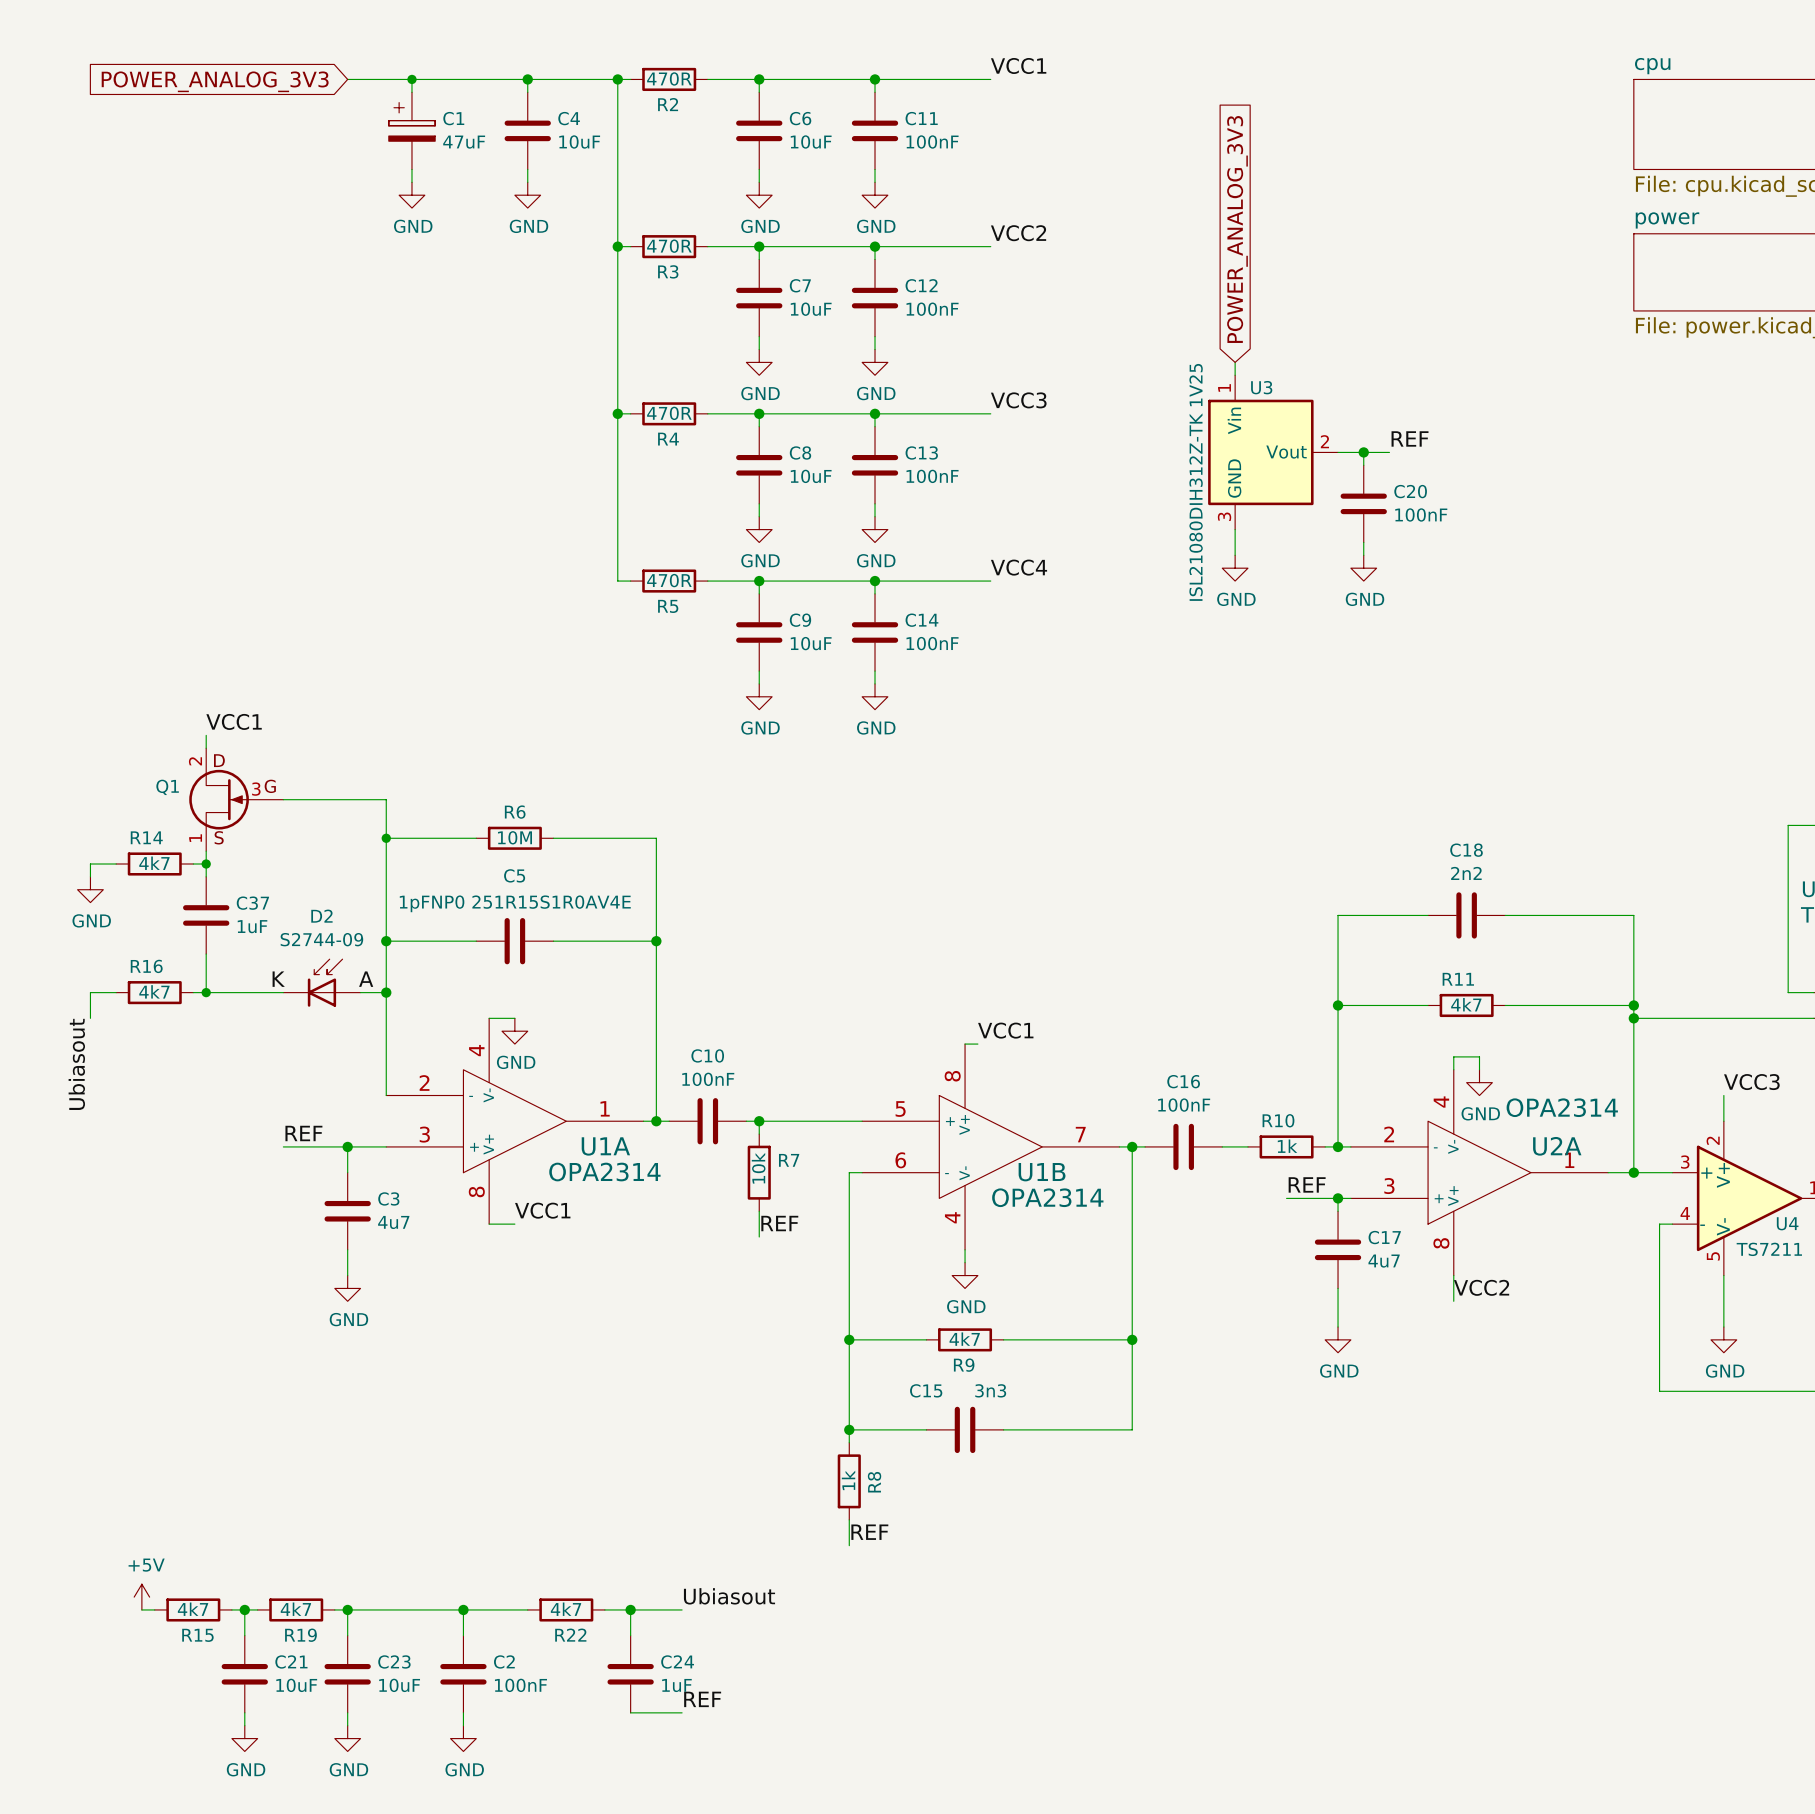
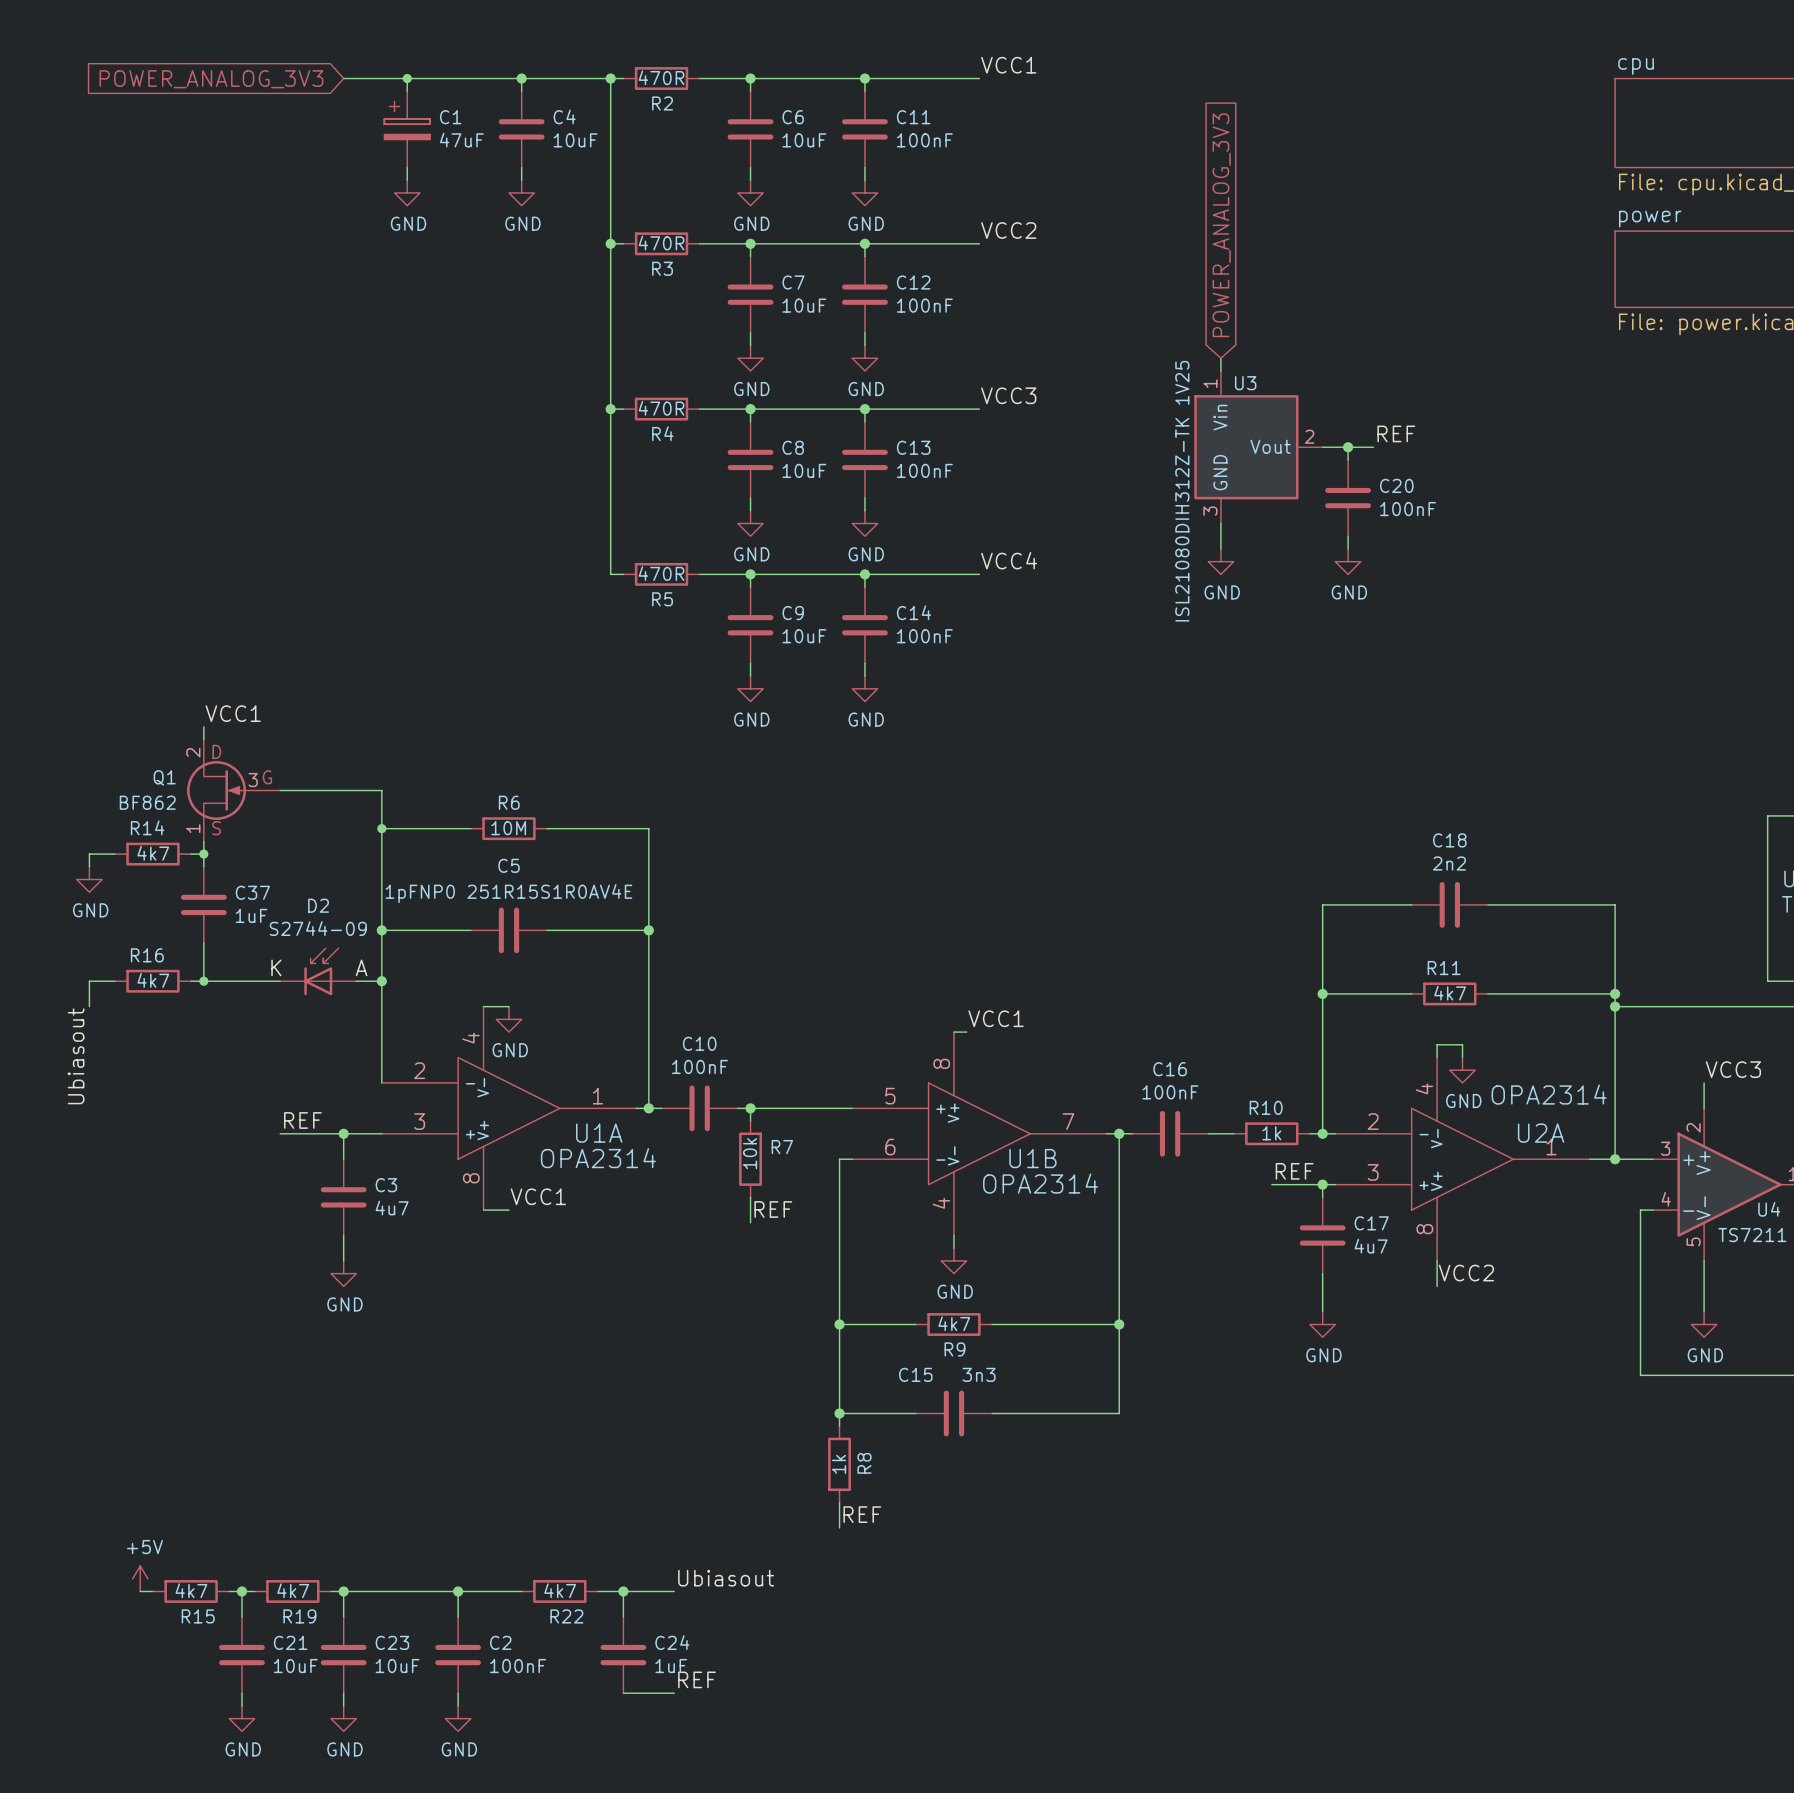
Q1 value: none -> BF862 (147, 802)

